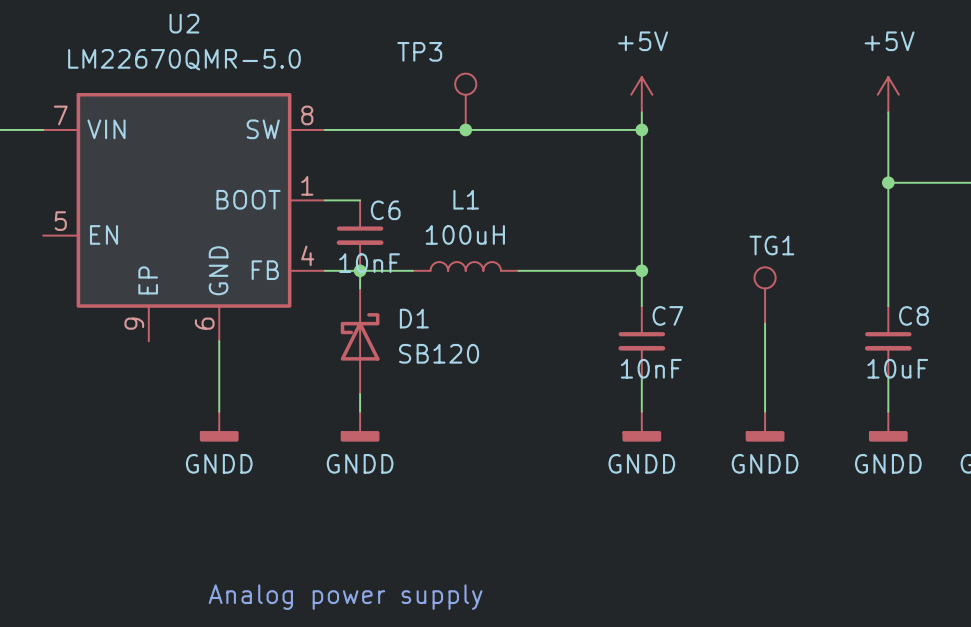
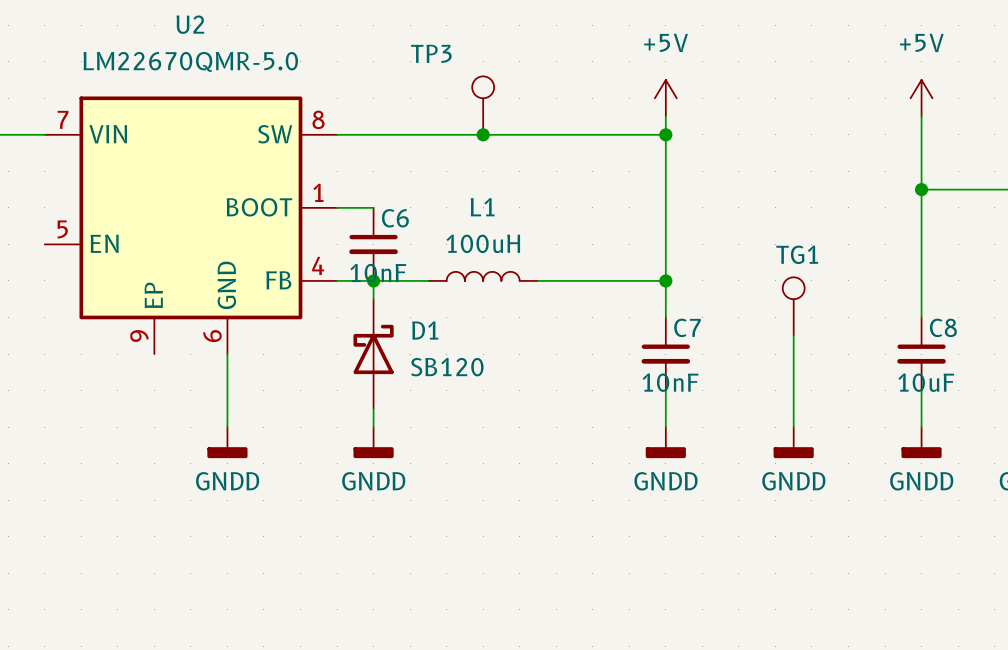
text: Analog power supply (345, 597) -> none

